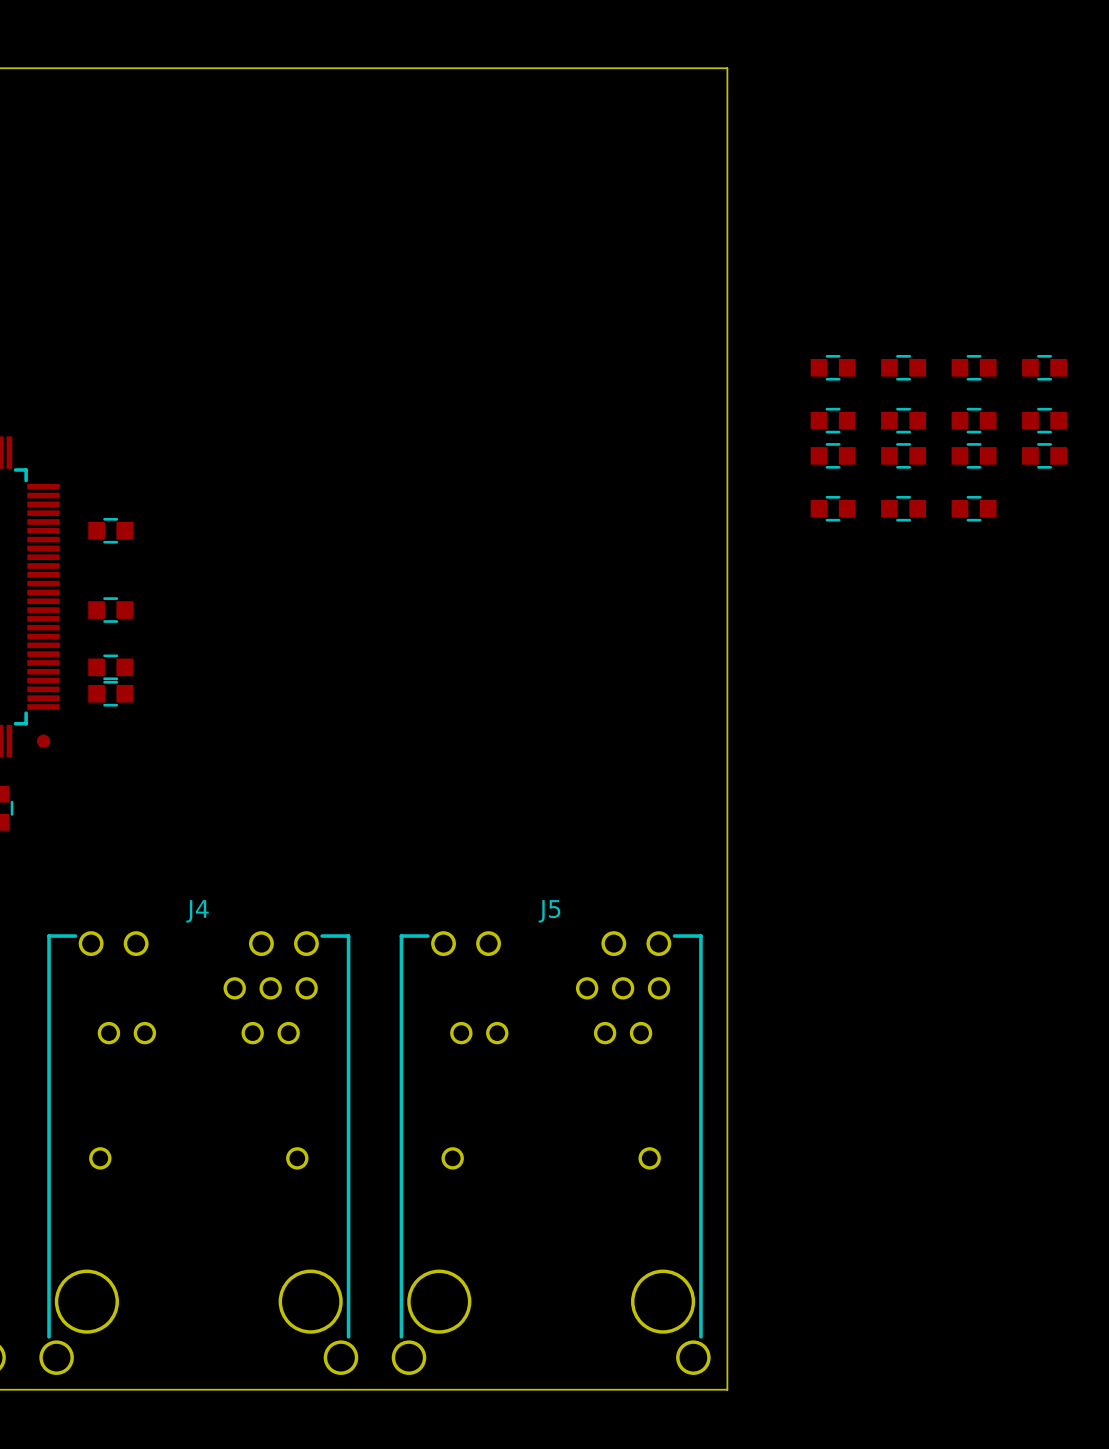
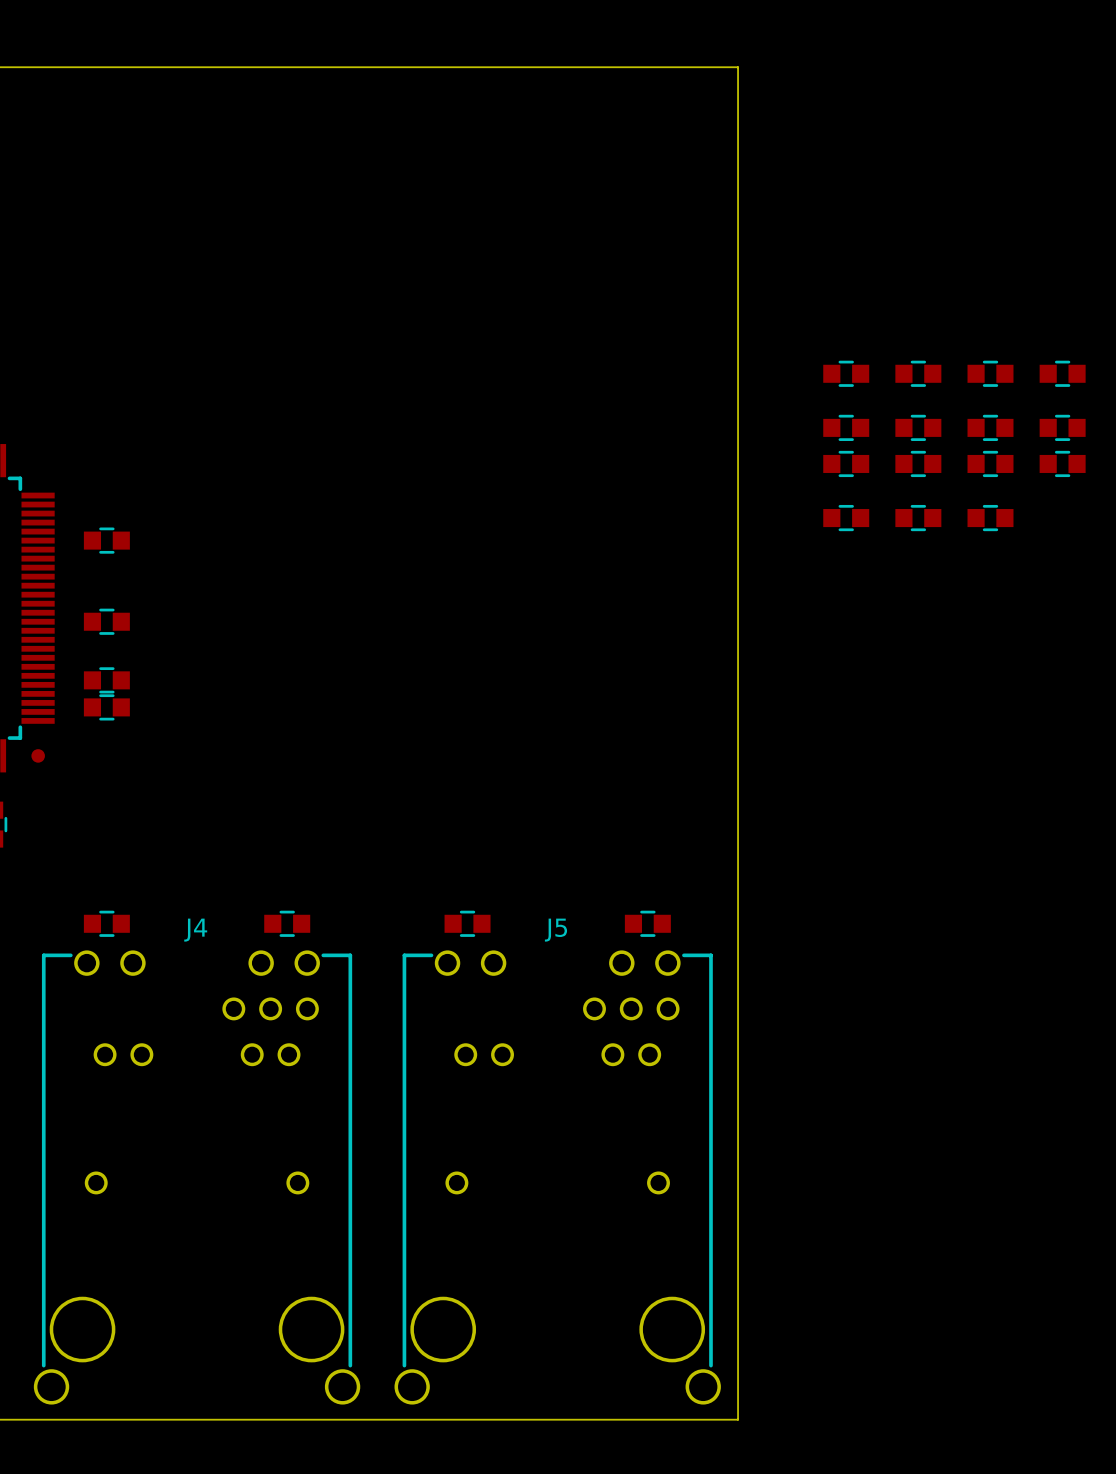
part: none -> (106, 923)
part: none -> (287, 923)
part: none -> (467, 923)
part: none -> (647, 923)

